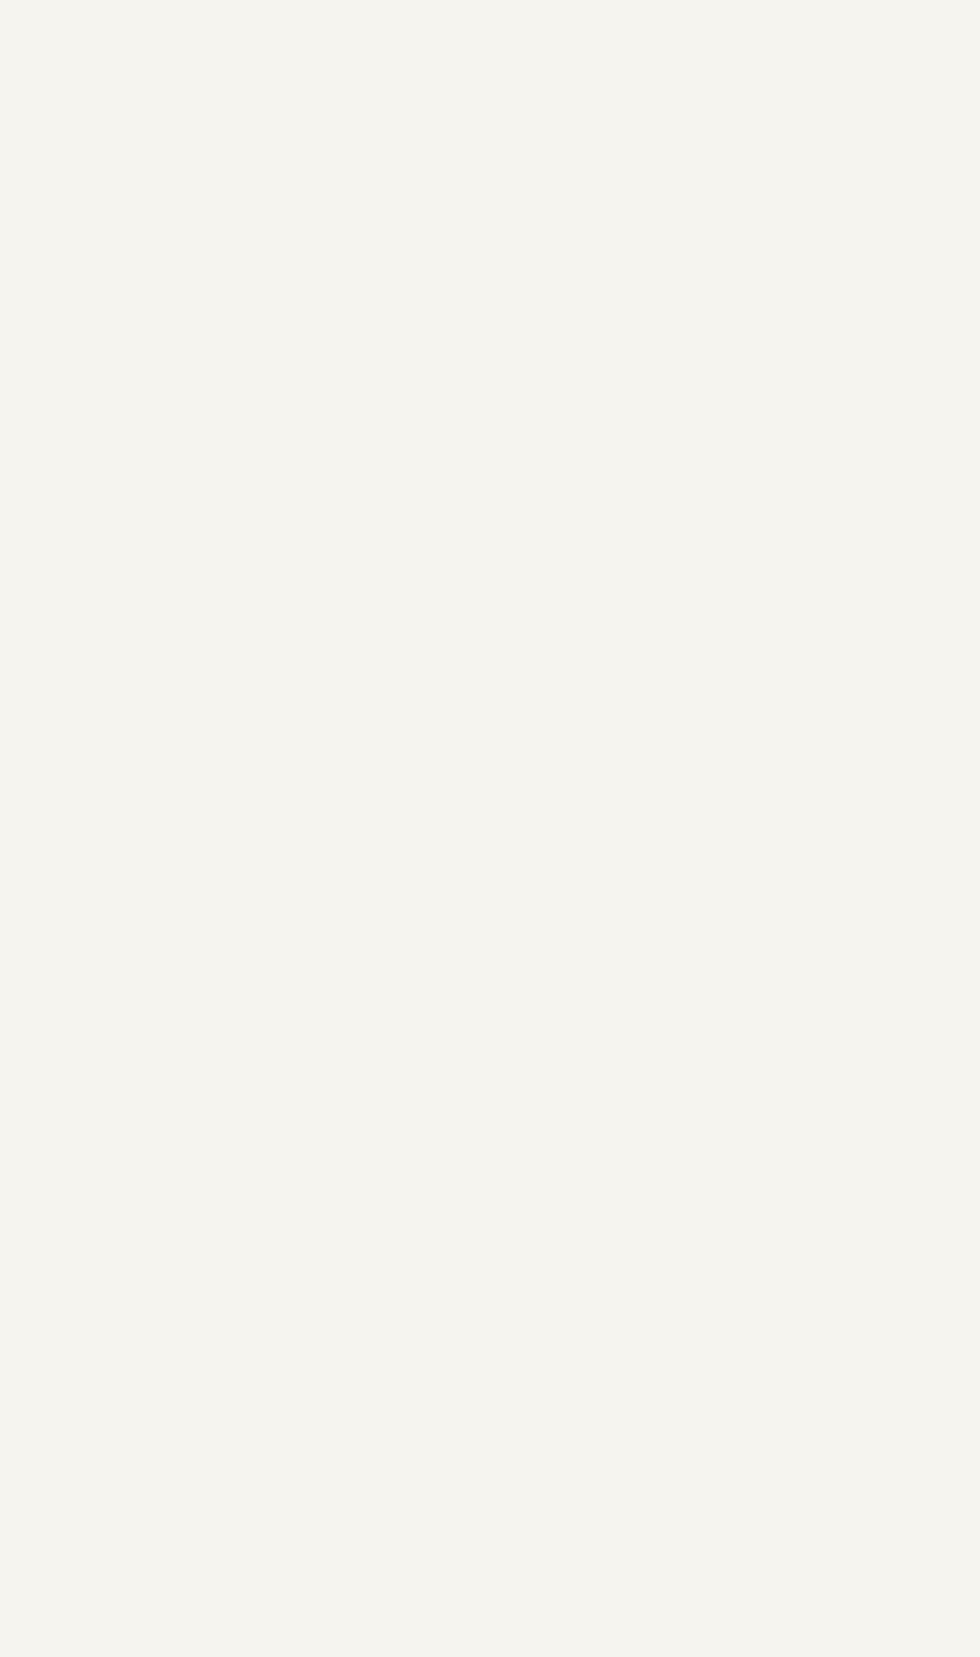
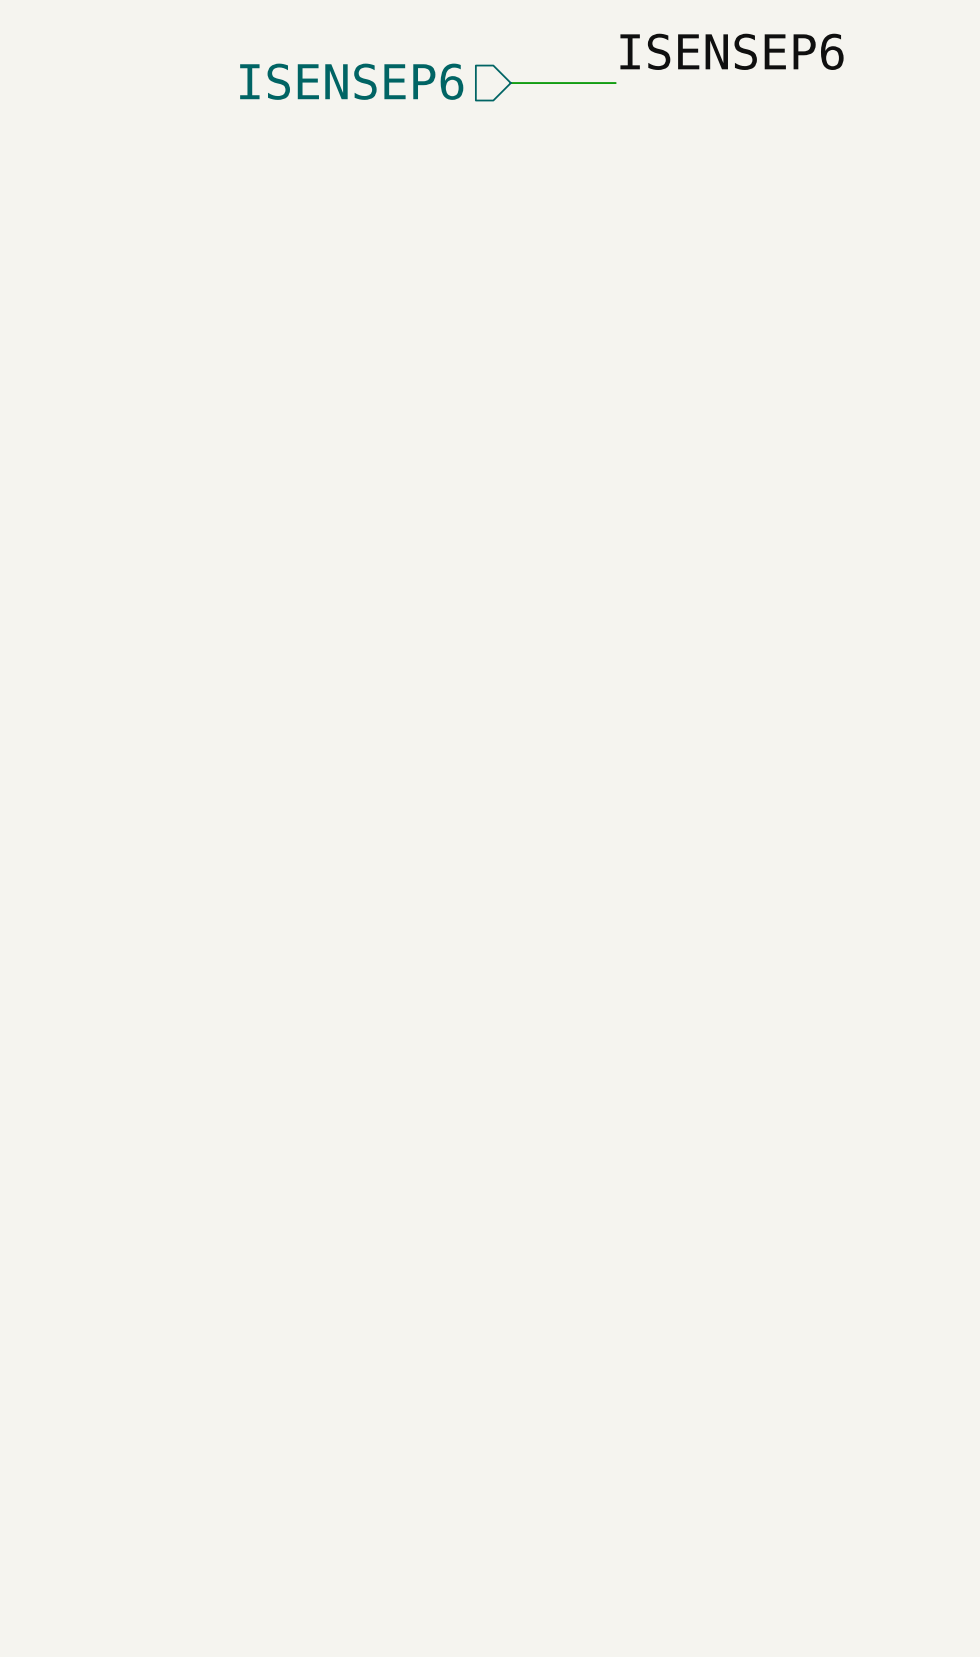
label: none -> ISENSEP6 (732, 51)
sheet pin: none -> ISENSEP6 (351, 81)
wire: none -> (510, 83) (615, 83)

